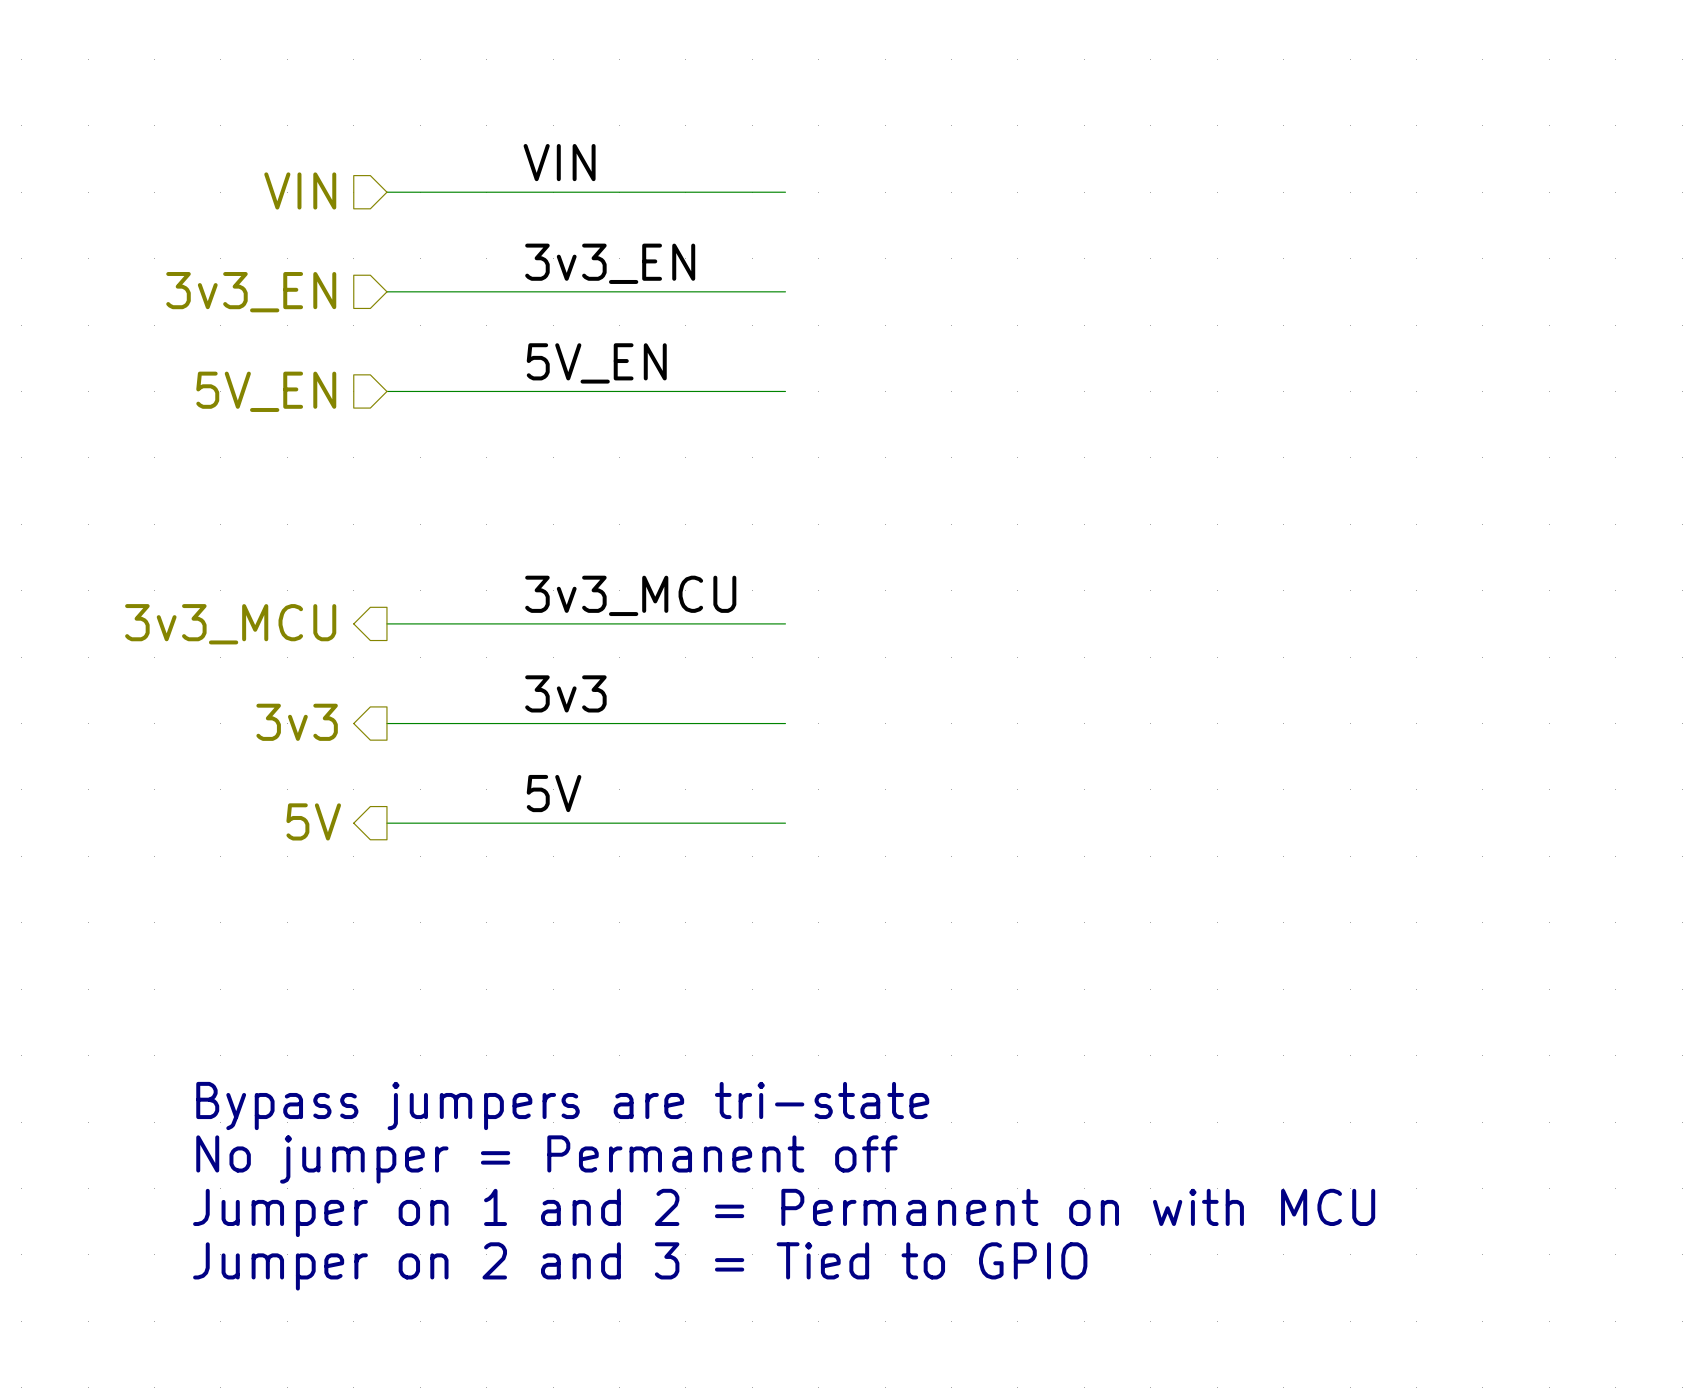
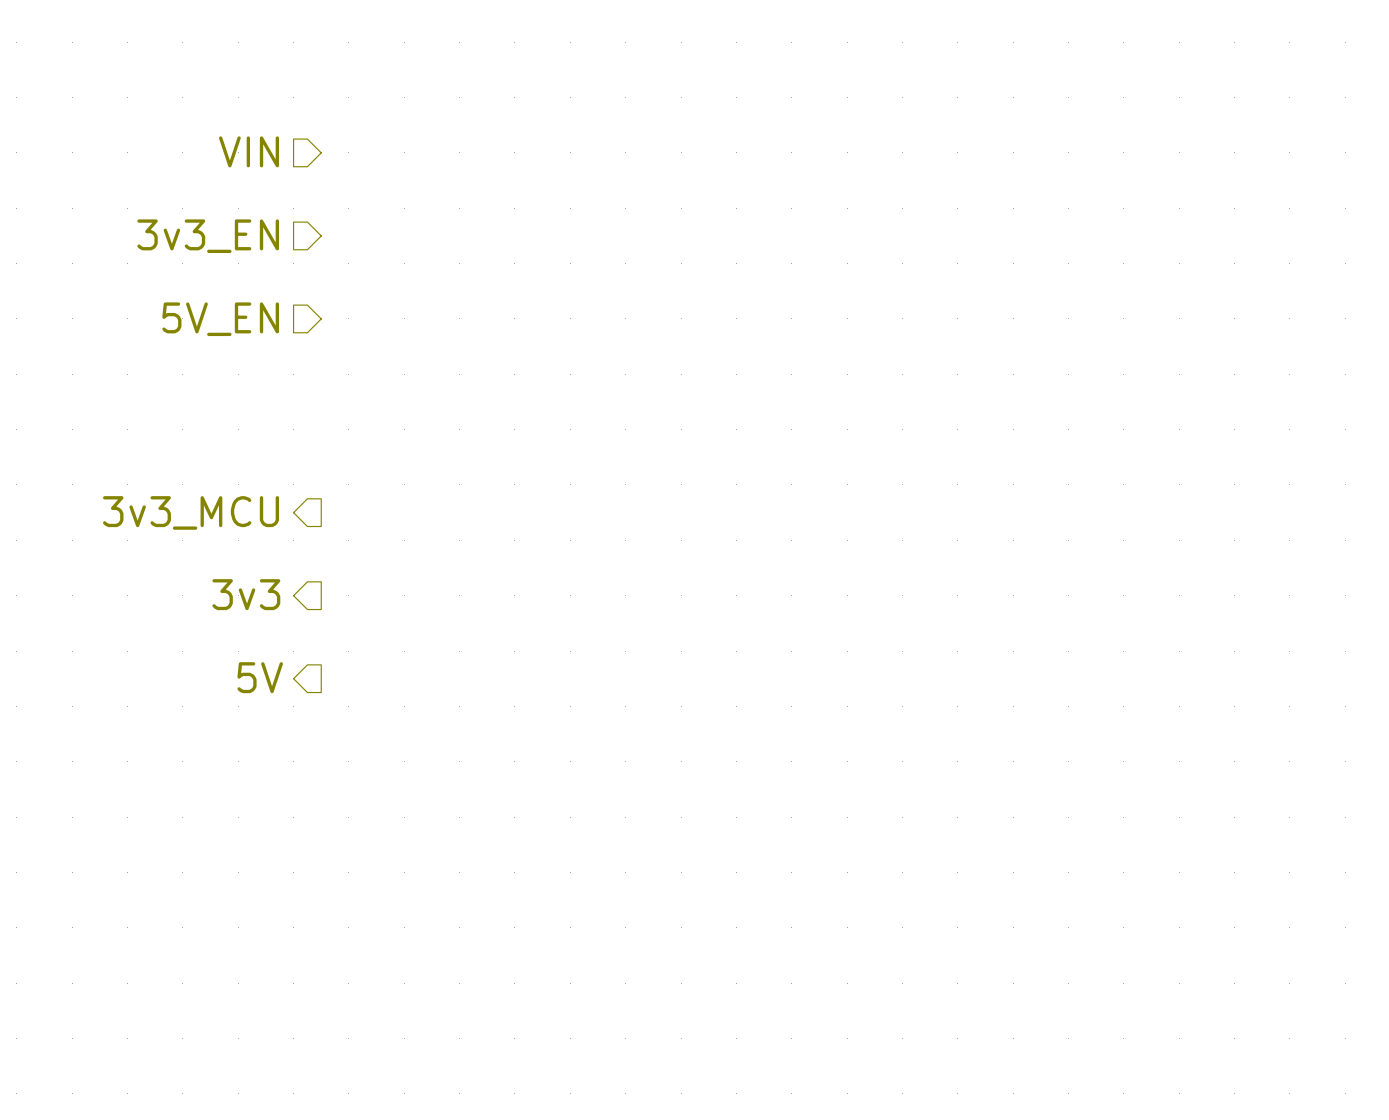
label: VIN (559, 162) -> none
wire: (386, 192) (785, 192) -> none
label: 3v3_EN (610, 263) -> none
wire: (386, 291) (785, 291) -> none
label: 5V_EN (596, 363) -> none
wire: (386, 391) (785, 391) -> none
label: 3v3_MCU (630, 595) -> none
wire: (386, 623) (785, 623) -> none
label: 3v3 (565, 693) -> none
wire: (386, 723) (785, 723) -> none
label: 5V (554, 793) -> none
wire: (386, 823) (785, 823) -> none
text: Bypass jumpers are tri-state (562, 1106) -> none
text: No jumper = Permanent off (546, 1159) -> none
text: Jumper on 1 and 2 = Permanent on with MCU (784, 1212) -> none
text: Jumper on 2 and 3 = Tied to GPIO (640, 1266) -> none

